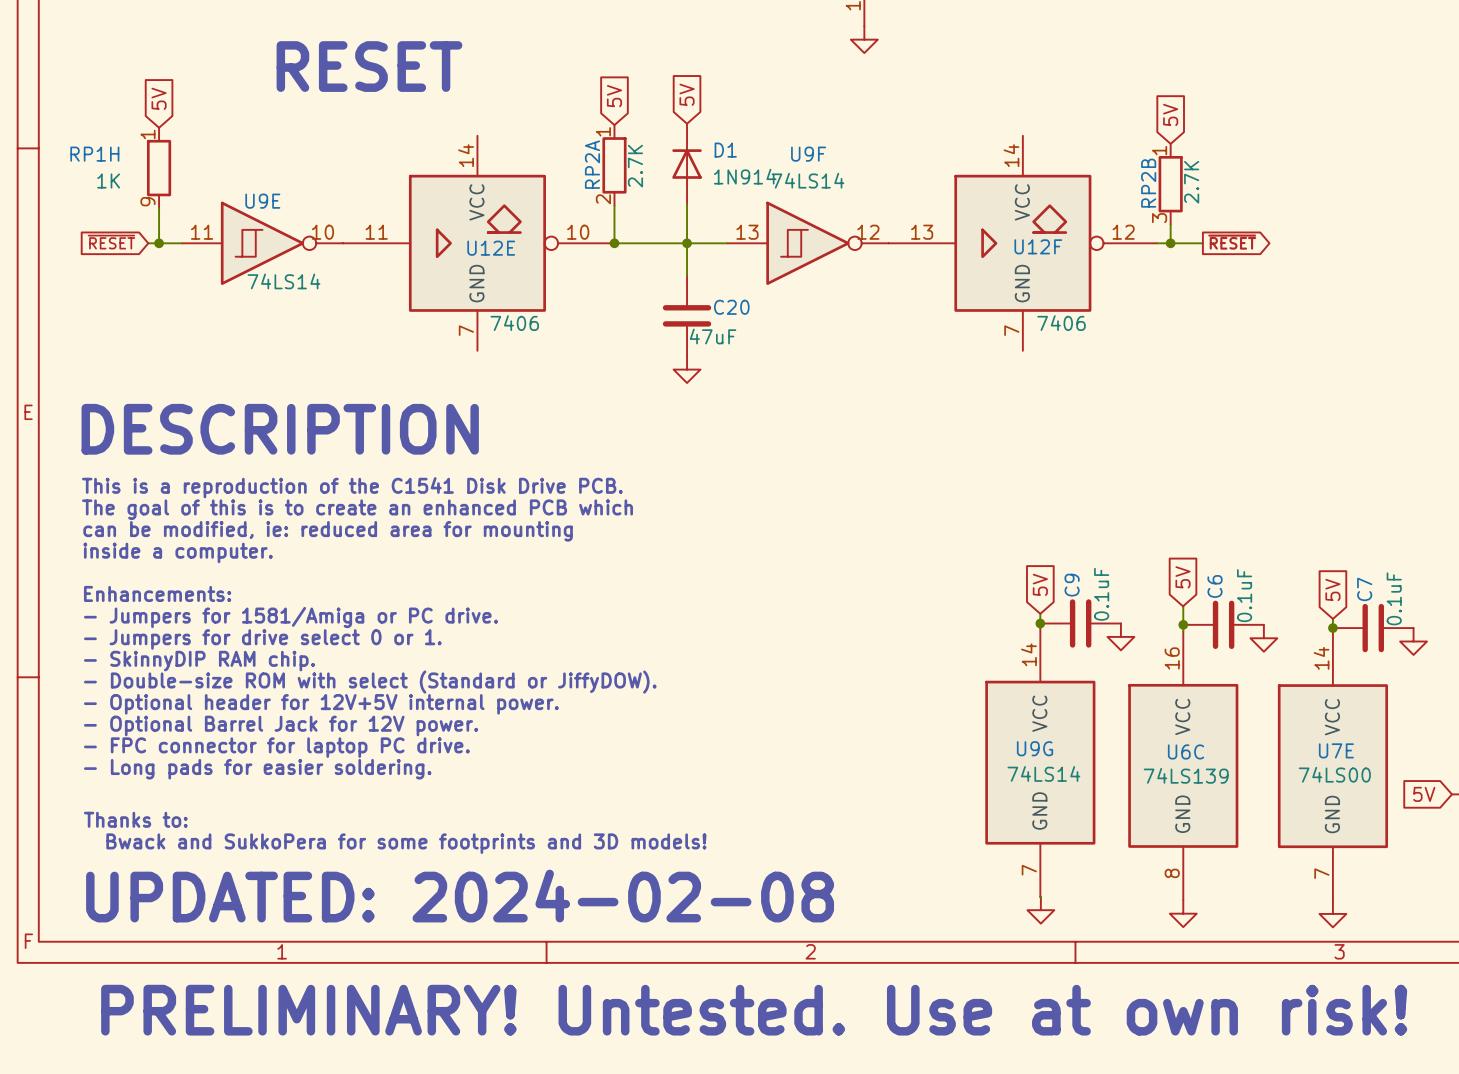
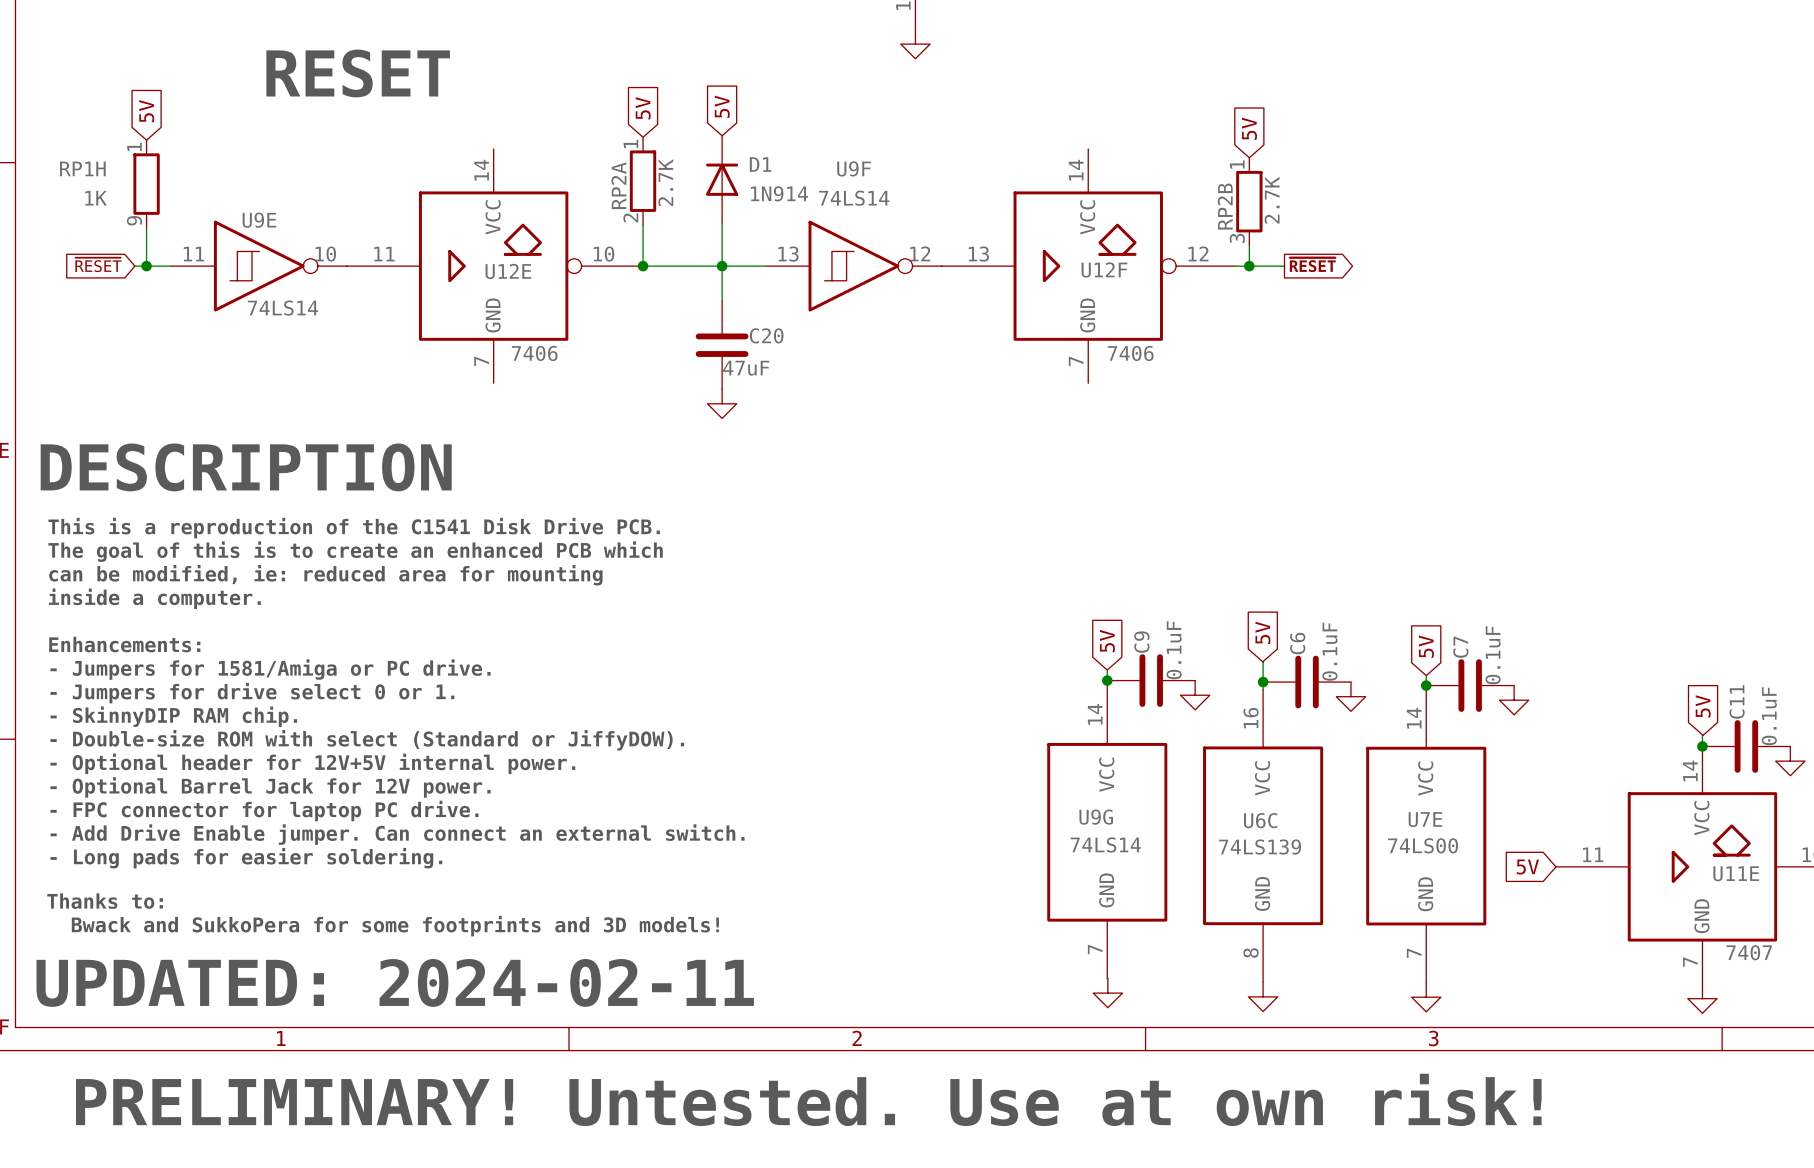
text position: DESCRIPTION (280, 429) -> DESCRIPTION (246, 467)
text position: This is a reproduction of the C1541 Disk Drive PCB. (352, 487) -> This is a reproduction of the C1541 Disk Drive PCB. (354, 528)
text position: The goal of this is to create an enhanced PCB which (357, 509) -> The goal of this is to create an enhanced PCB which (355, 551)
text position: can be modified, ie: reduced area for mounting (328, 531) -> can be modified, ie: reduced area for mounting (325, 575)
text position: inside a computer. (178, 552) -> inside a computer. (154, 598)
text position: Enhancements: (157, 593) -> Enhancements: (124, 644)
text position: - Jumpers for 1581/Amiga or PC drive. (290, 617) -> - Jumpers for 1581/Amiga or PC drive. (270, 669)
text position: - Jumpers for drive select 0 or 1. (262, 639) -> - Jumpers for drive select 0 or 1. (252, 693)
text position: - SkinnyDIP RAM chip. (199, 661) -> - SkinnyDIP RAM chip. (173, 716)
text position: - Double-size ROM with select (Standard or JiffyDOW). (370, 682) -> - Double-size ROM with select (Standard or JiffyDOW). (367, 740)
text position: - Optional header for 12V+5V internal power. (321, 704) -> - Optional header for 12V+5V internal power. (312, 763)
text position: - Optional Barrel Jack for 12V power. (281, 725) -> - Optional Barrel Jack for 12V power. (270, 787)
text position: - FPC connector for laptop PC drive. (276, 747) -> - FPC connector for laptop PC drive. (264, 811)
text: none -> - Add Drive Enable jumper. Can connect an external switch. (397, 834)
text position: - Long pads for easier soldering. (257, 769) -> - Long pads for easier soldering. (246, 858)
text position: Thanks to: (135, 819) -> Thanks to: (105, 901)
text position: Bwack and SukkoPera for some footprints and 3D models! (406, 843) -> Bwack and SukkoPera for some footprints and 3D models! (395, 926)
text: UPDATED: 2024-02-08 (460, 896) -> UPDATED: 2024-02-11 (395, 982)

